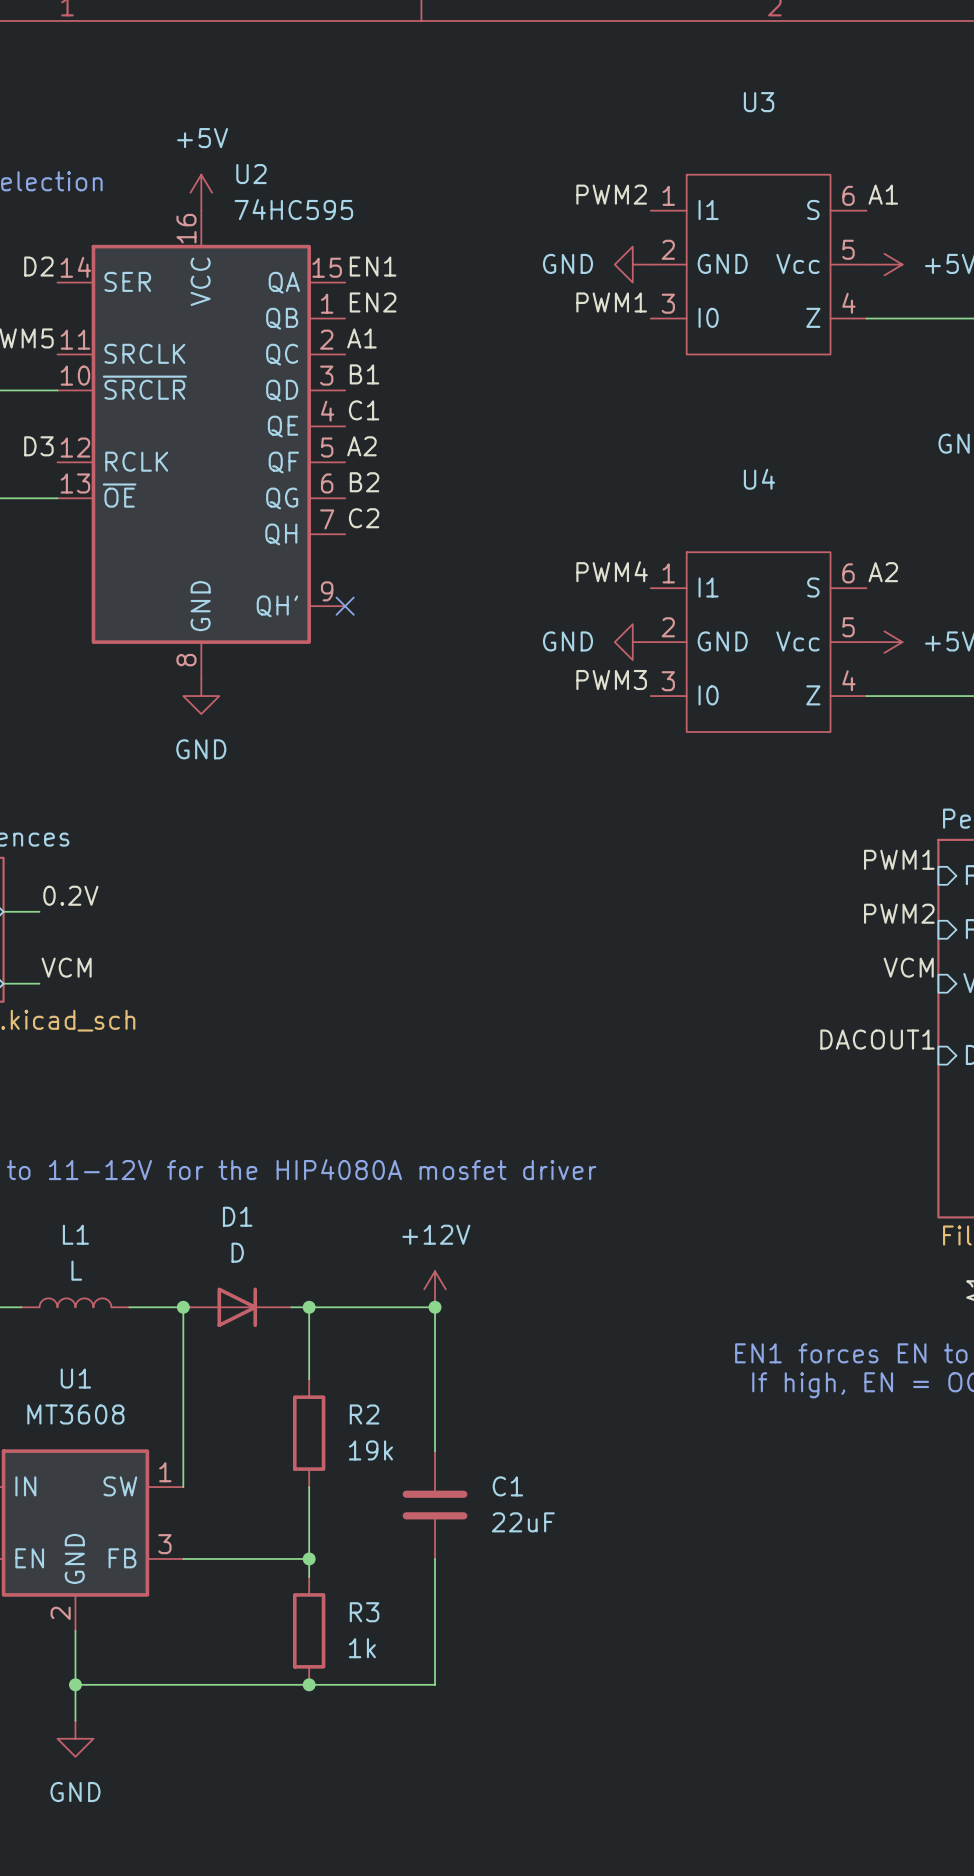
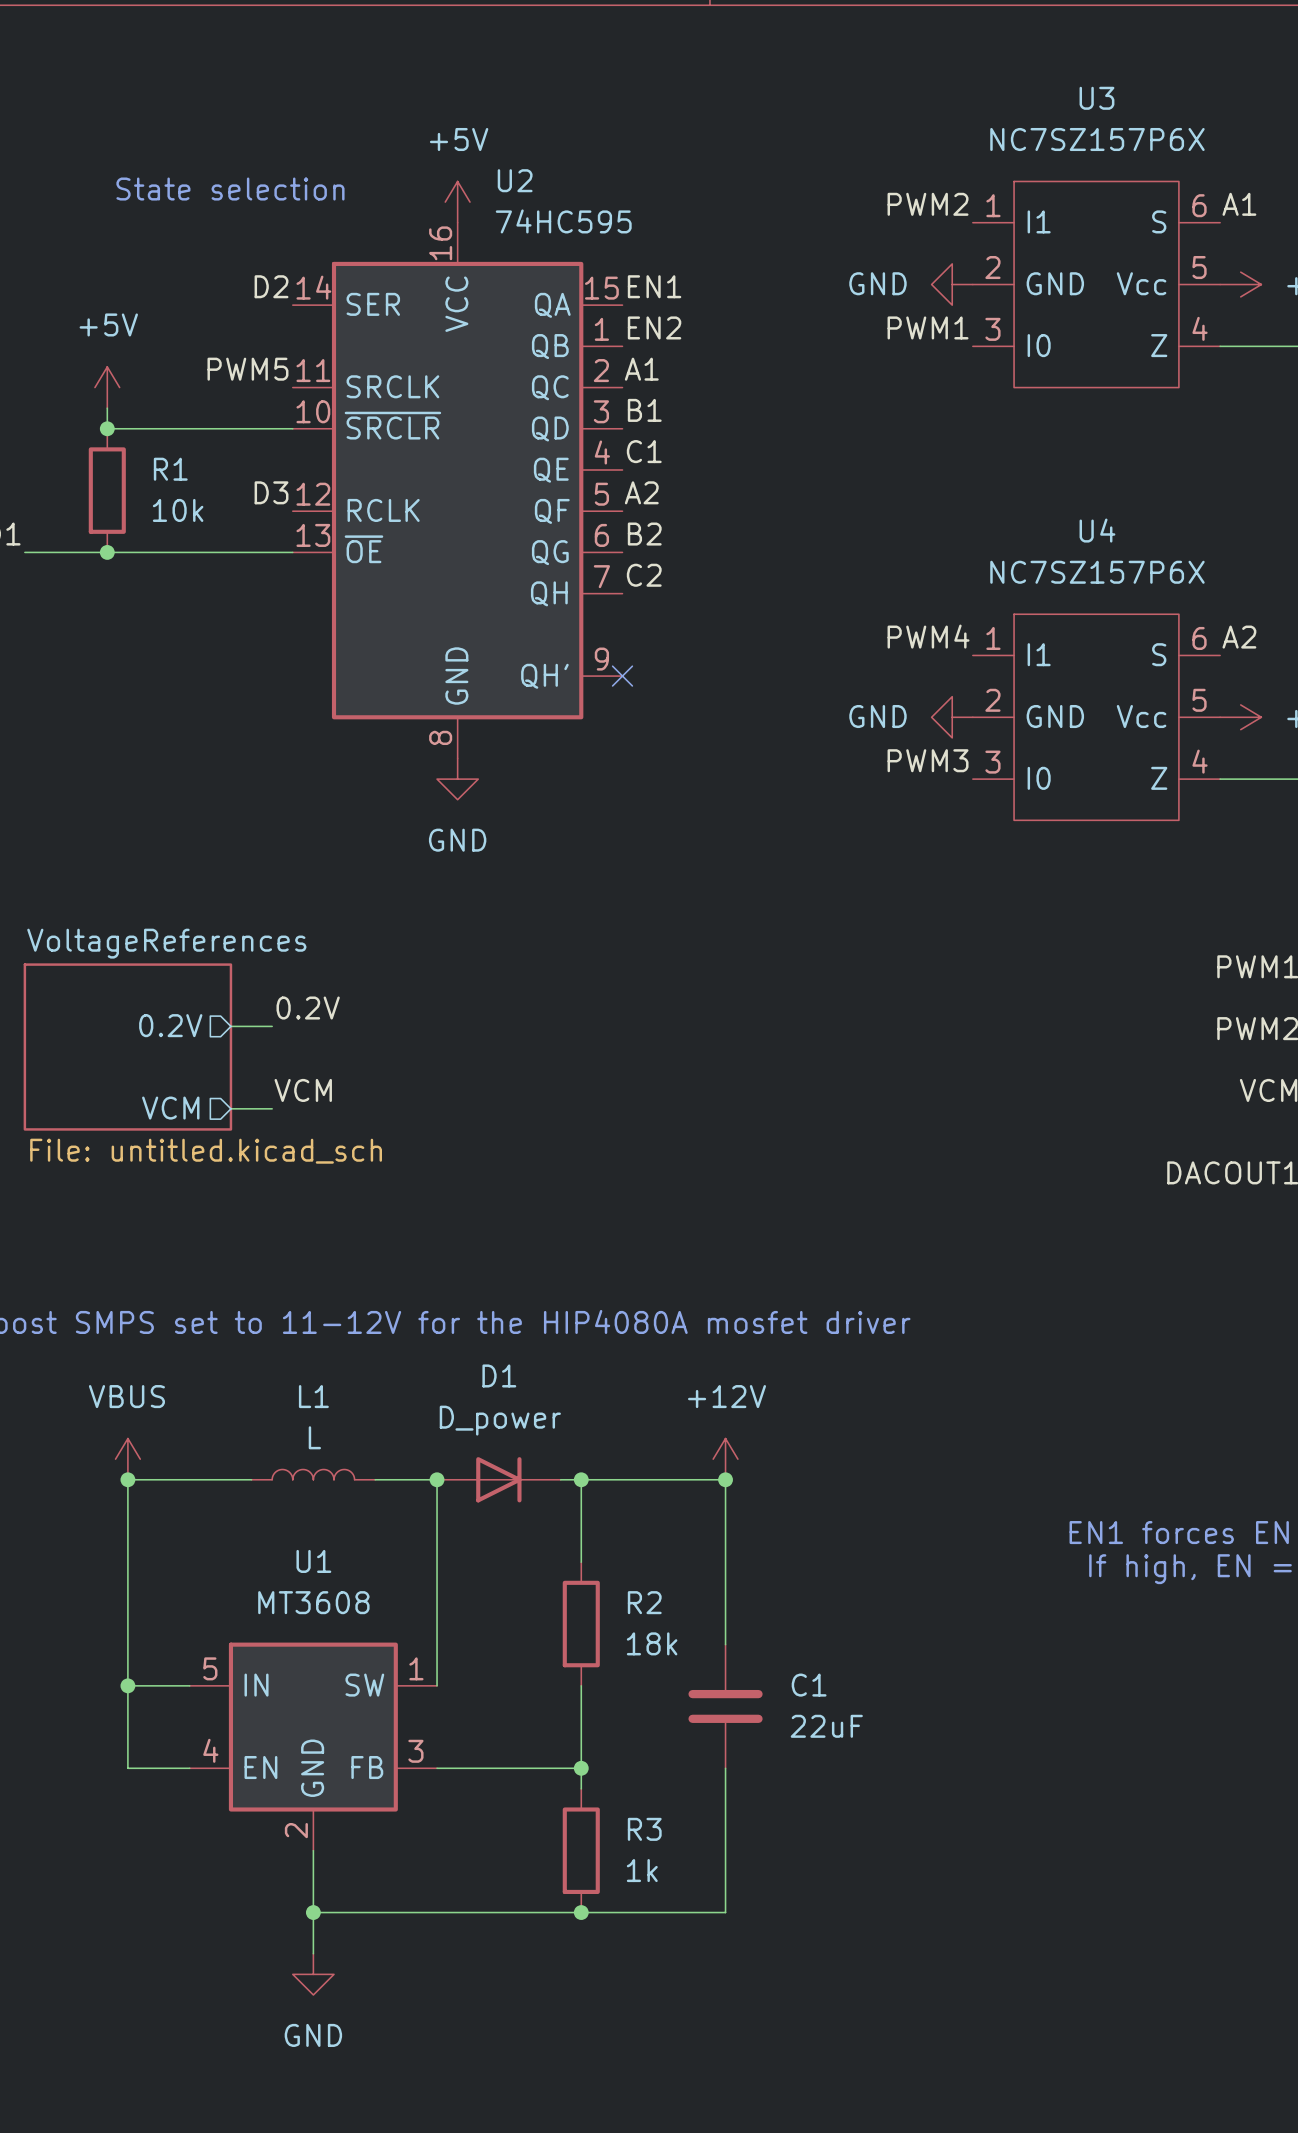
U3 value: none -> NC7SZ157P6X (1097, 139)
U4 value: none -> NC7SZ157P6X (1097, 572)
D1 value: D (237, 1252) -> D_power (500, 1420)
R2 value: 19k (370, 1450) -> 18k (652, 1643)

